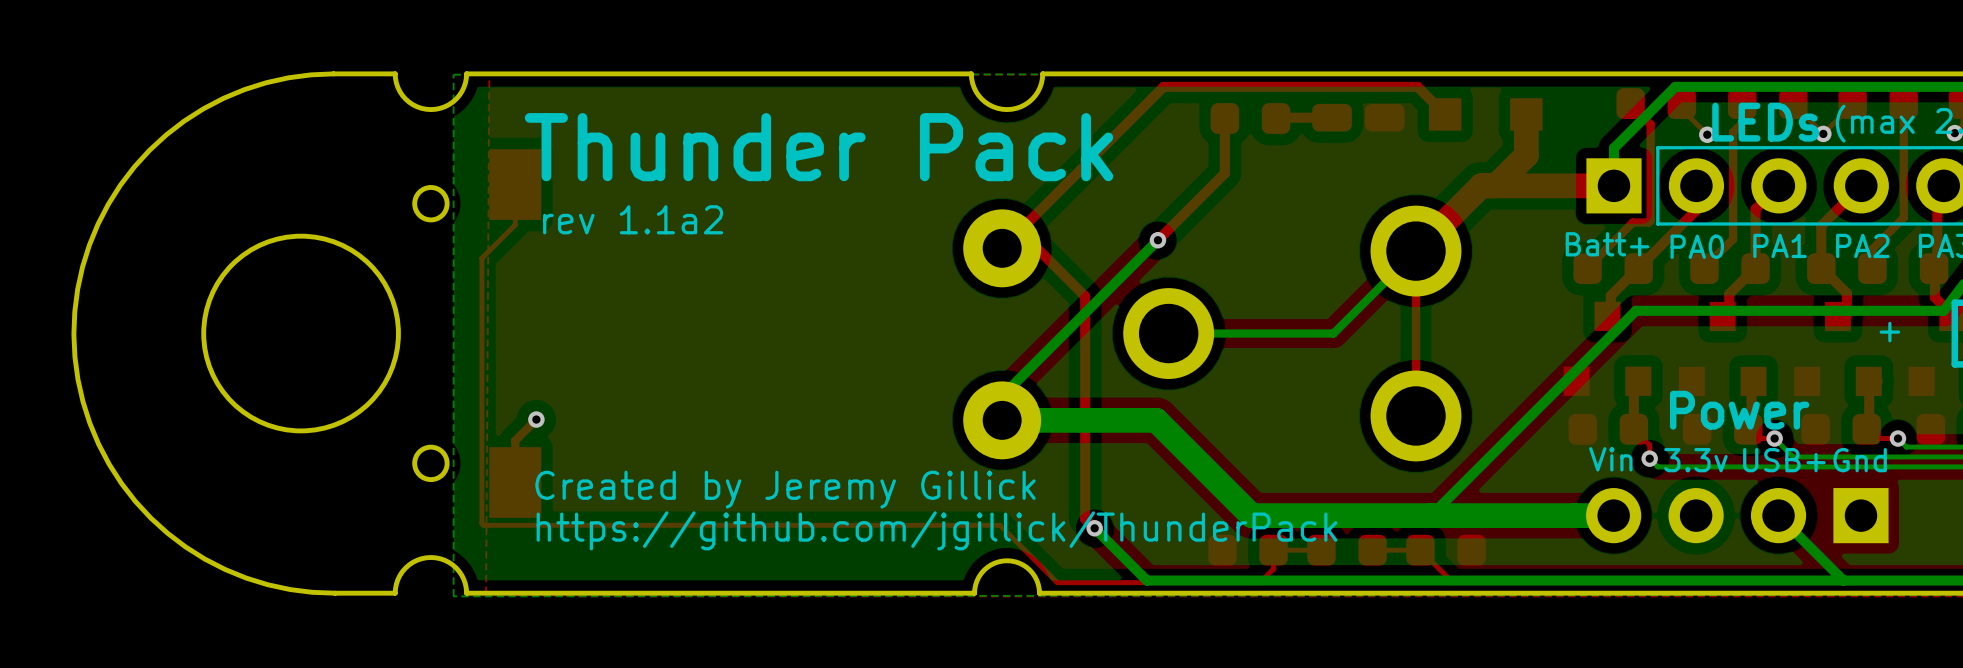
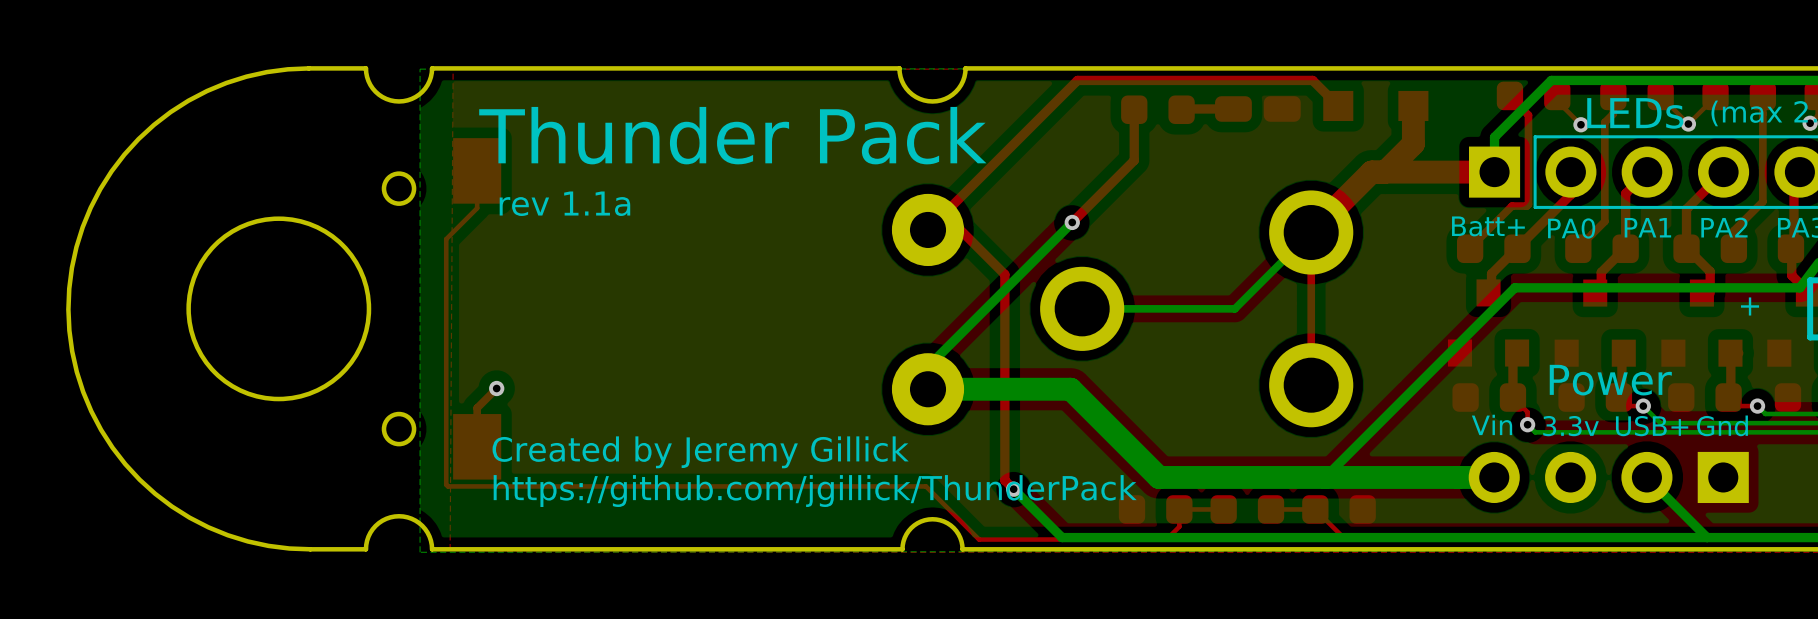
text: rev 1.1a2 (633, 219) -> rev 1.1a (564, 203)

